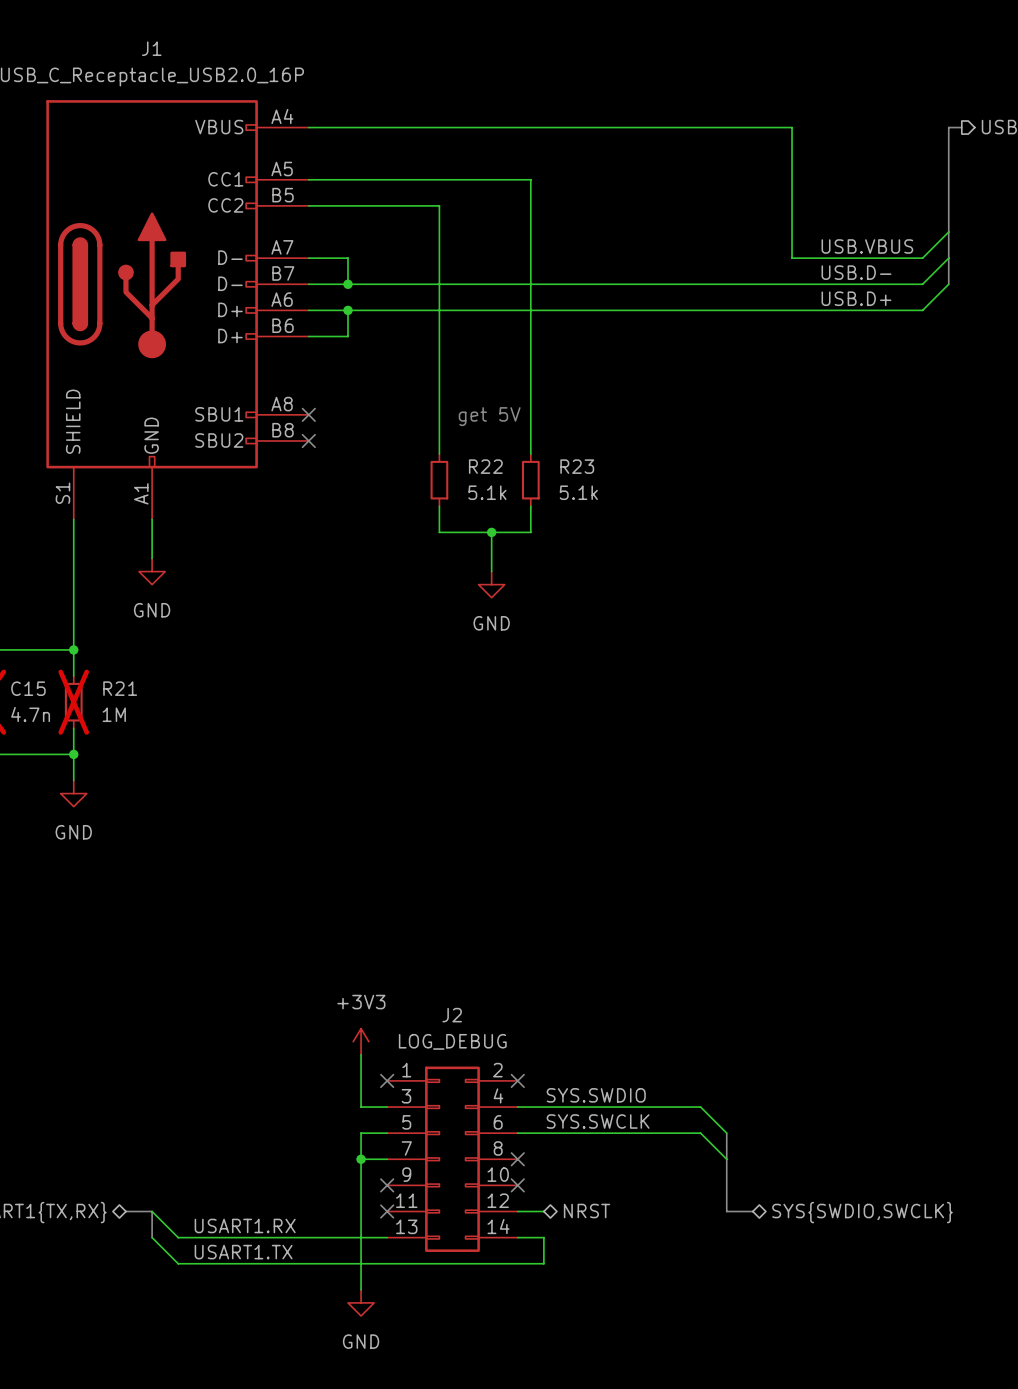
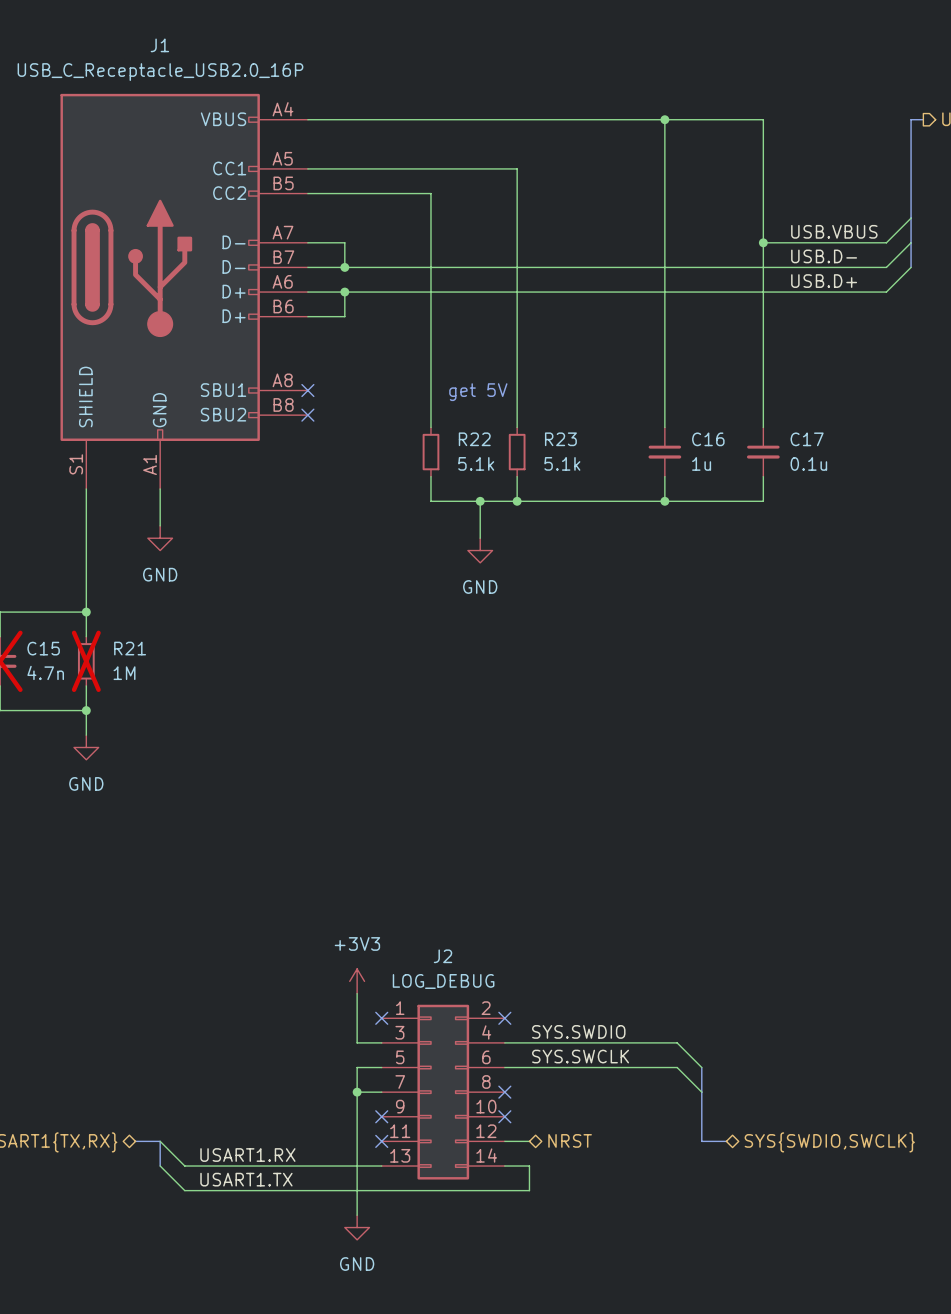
wire: none -> (664, 119) (664, 427)
junction: none -> (664, 119)
wire: none -> (763, 242) (763, 427)
junction: none -> (763, 242)
C16: none -> 1u (664, 452)
C17: none -> 0.1u (763, 452)
wire: none -> (664, 476) (664, 501)
wire: none -> (763, 476) (763, 501) (517, 501)
junction: none -> (517, 501)
junction: none -> (664, 501)

